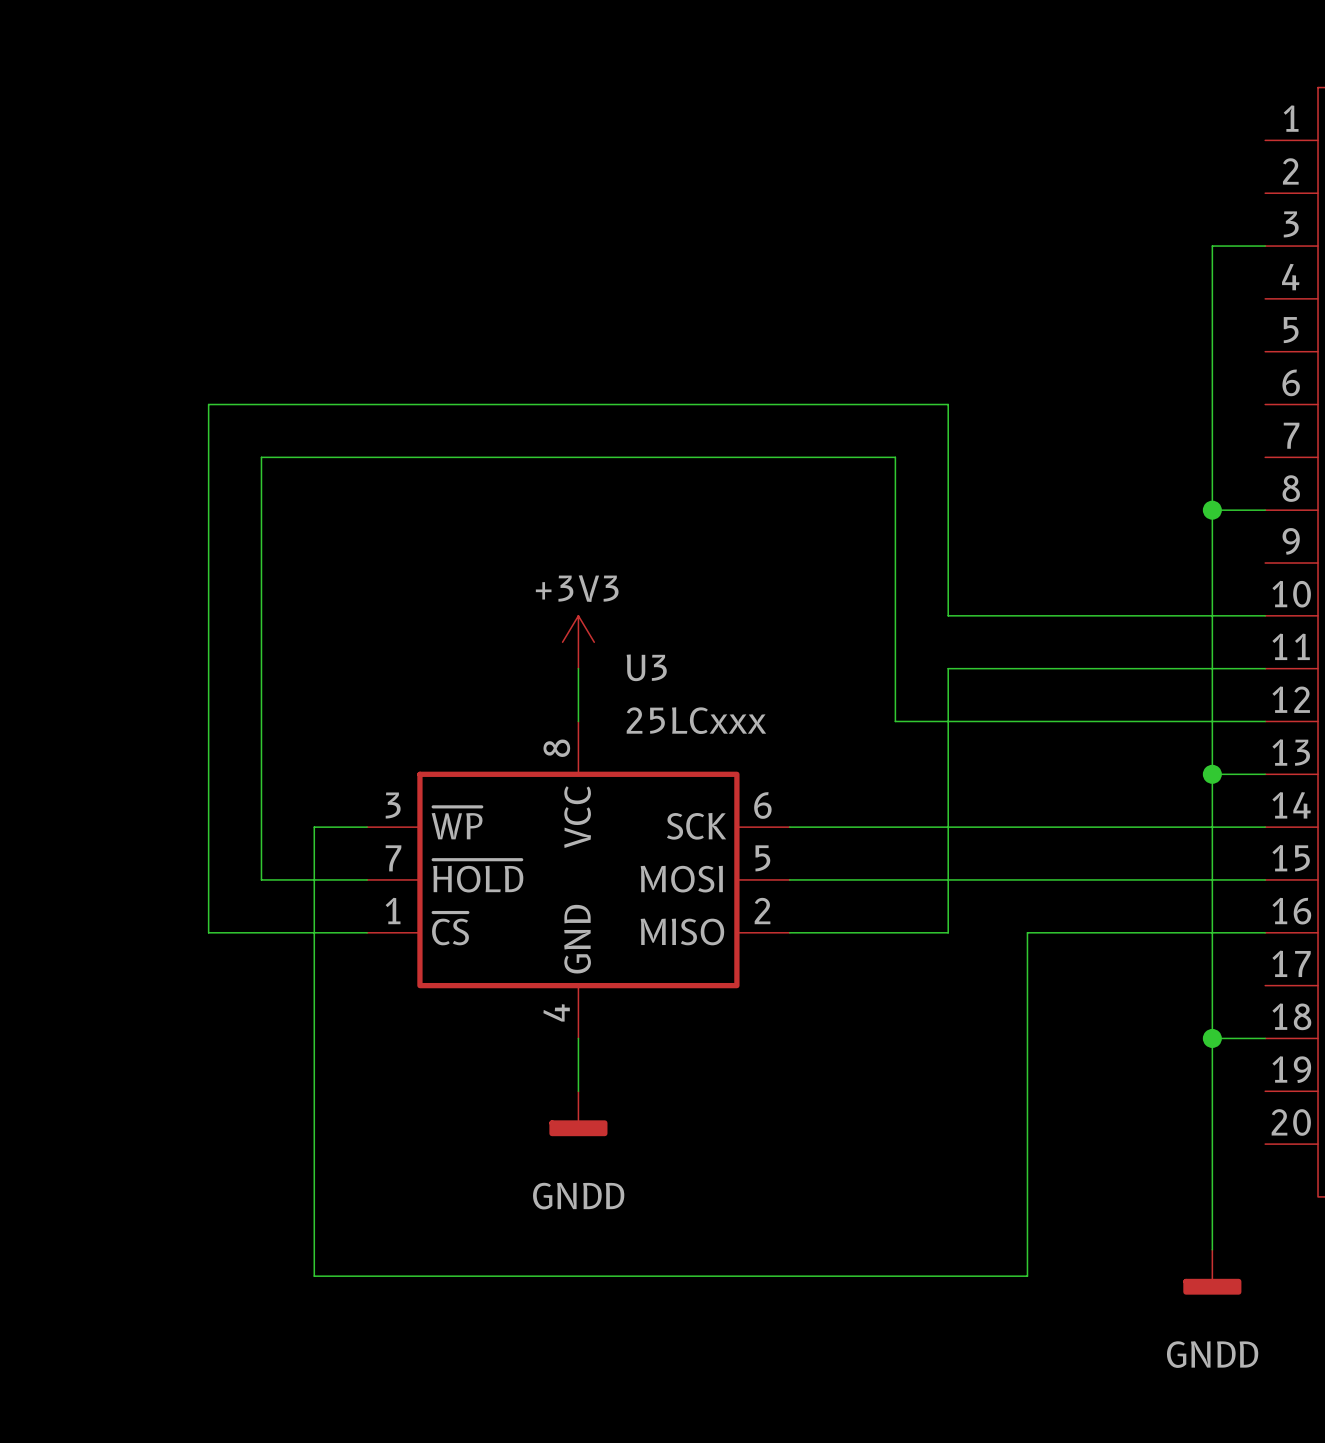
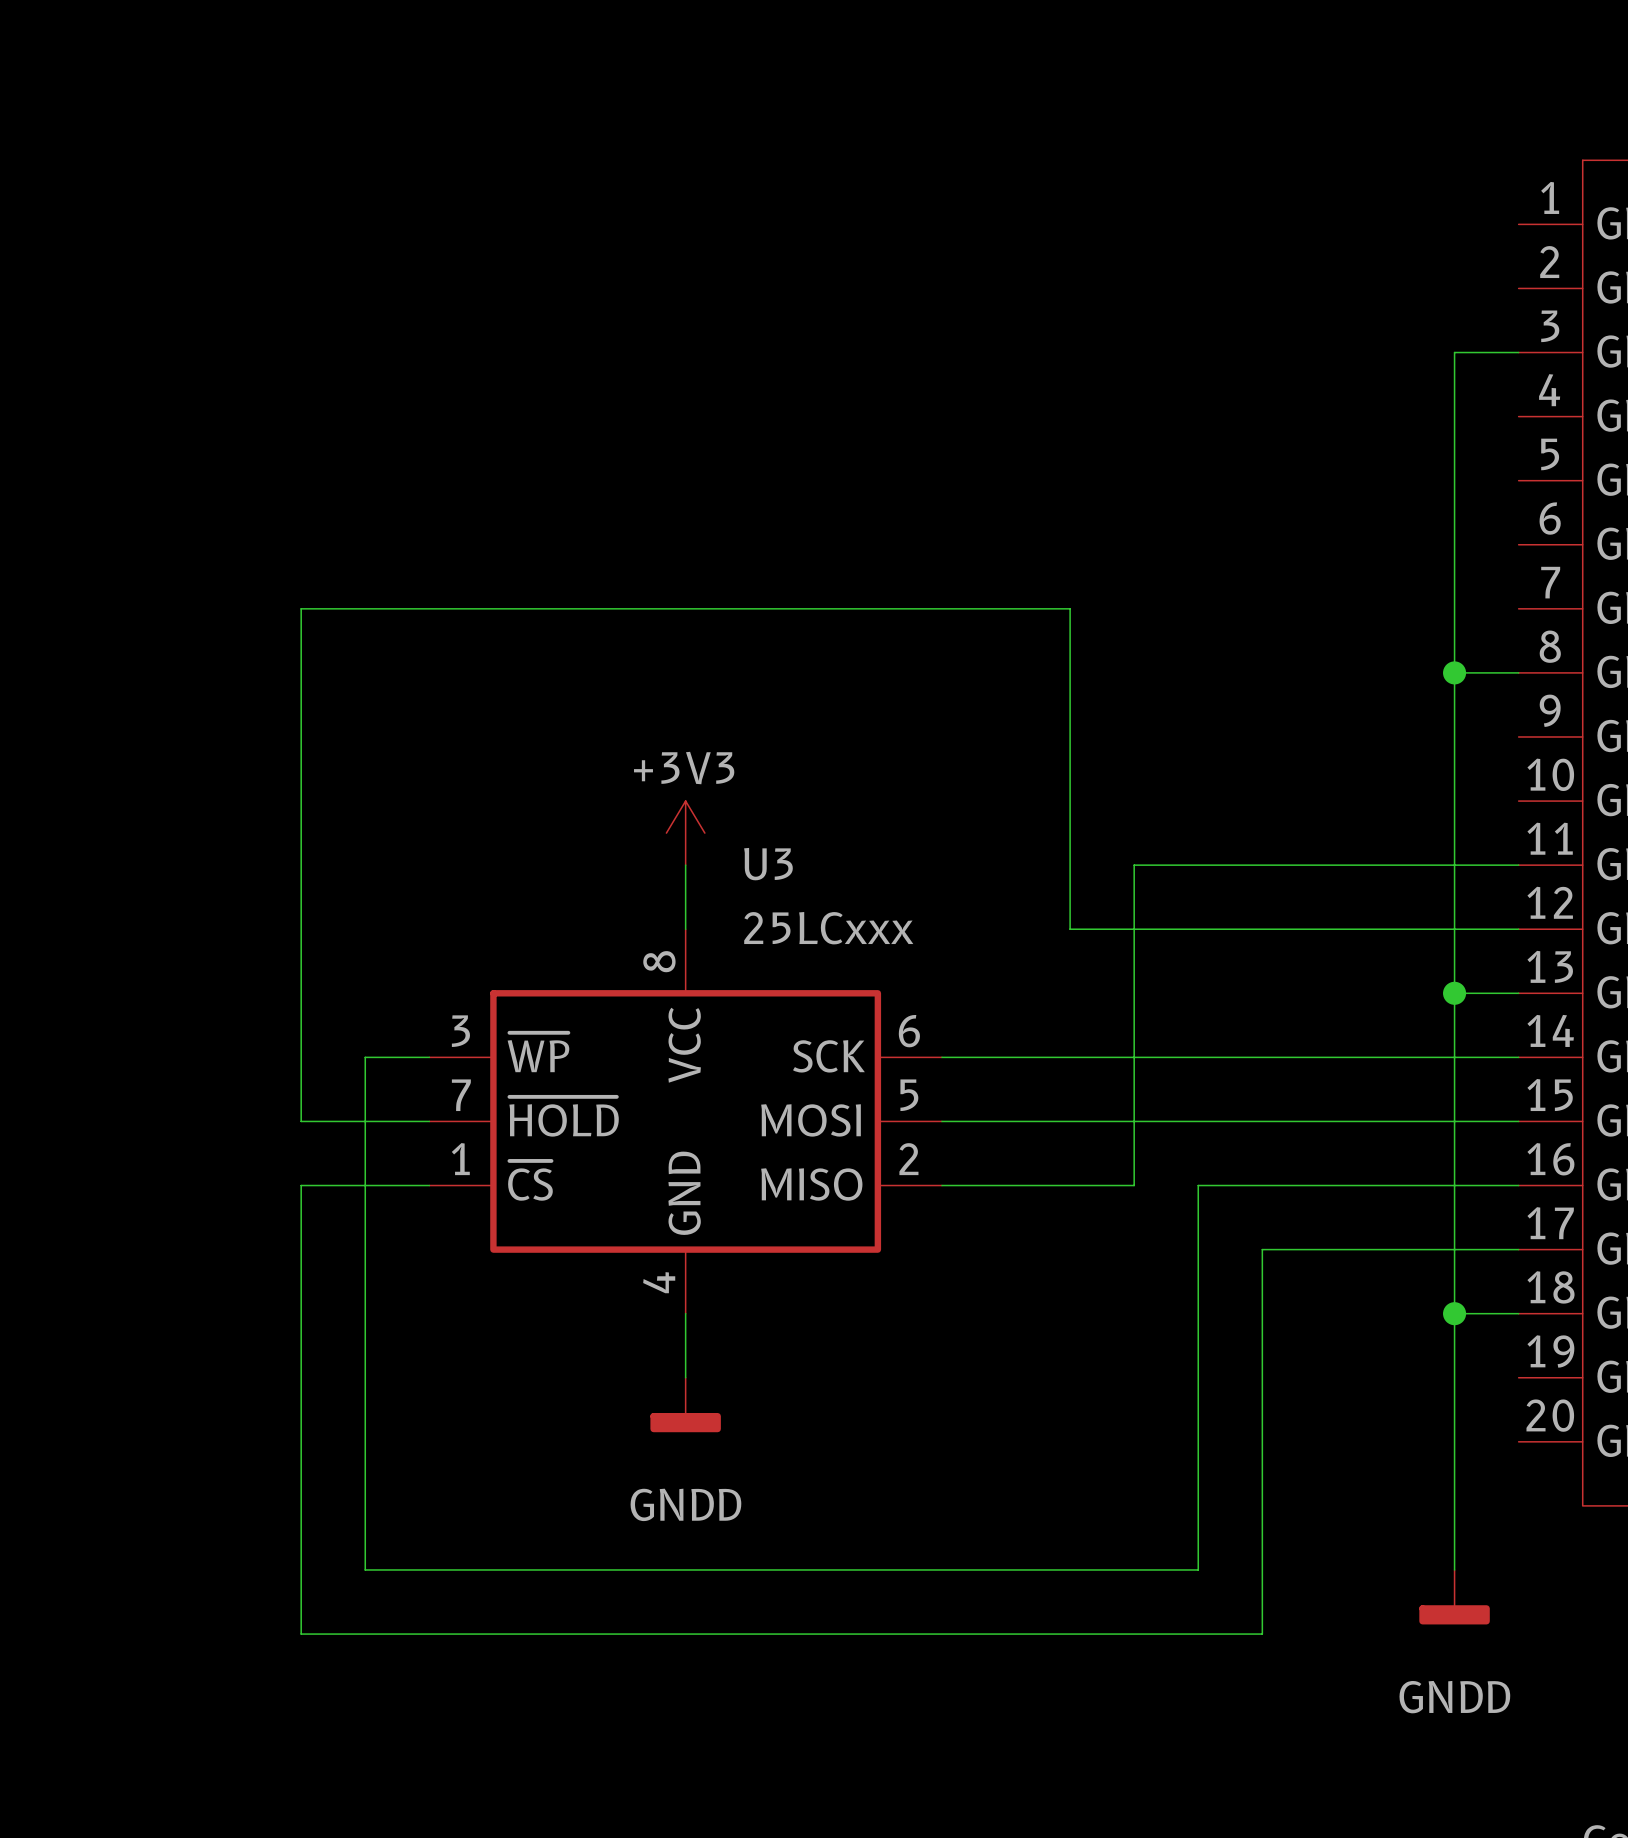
wire: (1265, 615) (948, 615) (948, 404) (208, 404) (208, 932) (261, 932) -> (1518, 1249) (1262, 1249) (1262, 1634) (301, 1634) (301, 1185)
wire: (1027, 932) (1027, 1276) (314, 1276) (314, 1249) -> (1230, 1185) (1198, 1185) (1198, 1569) (365, 1569)

